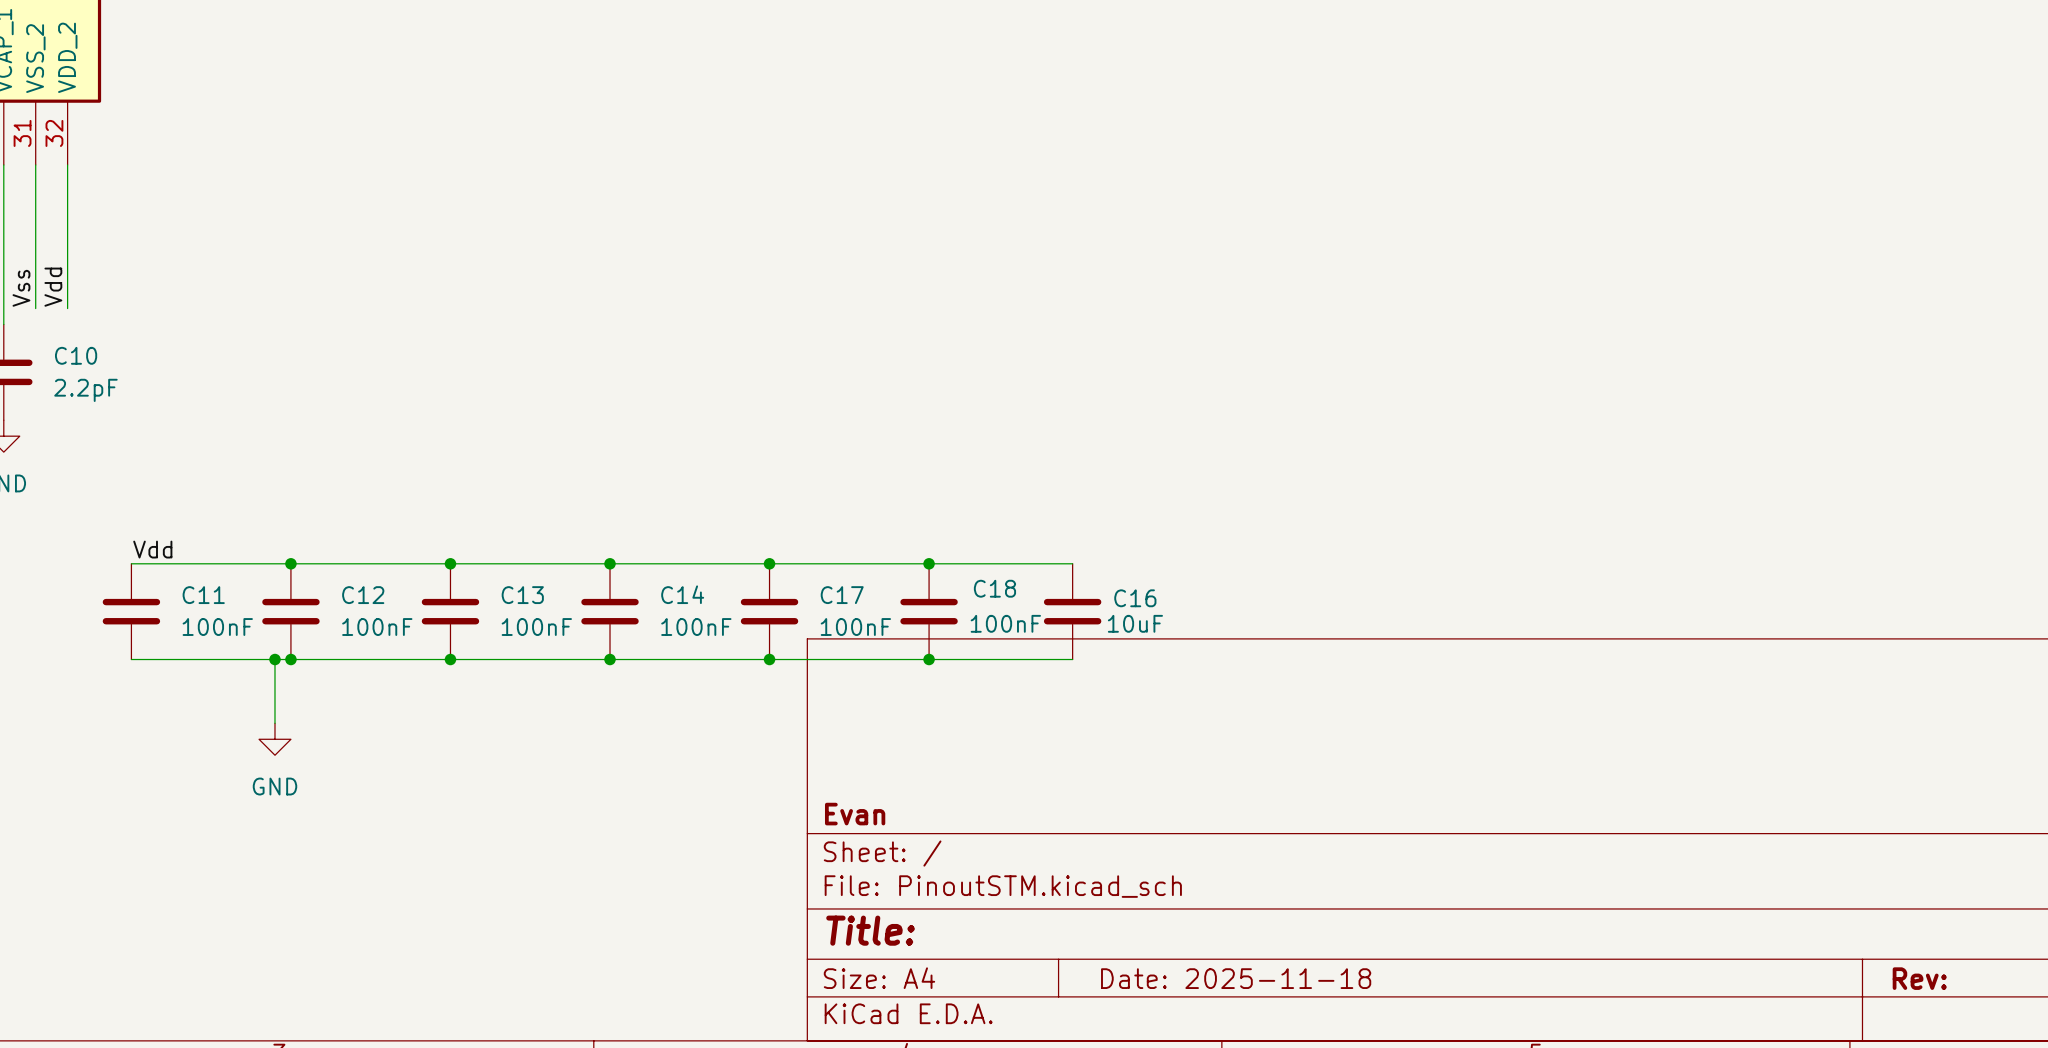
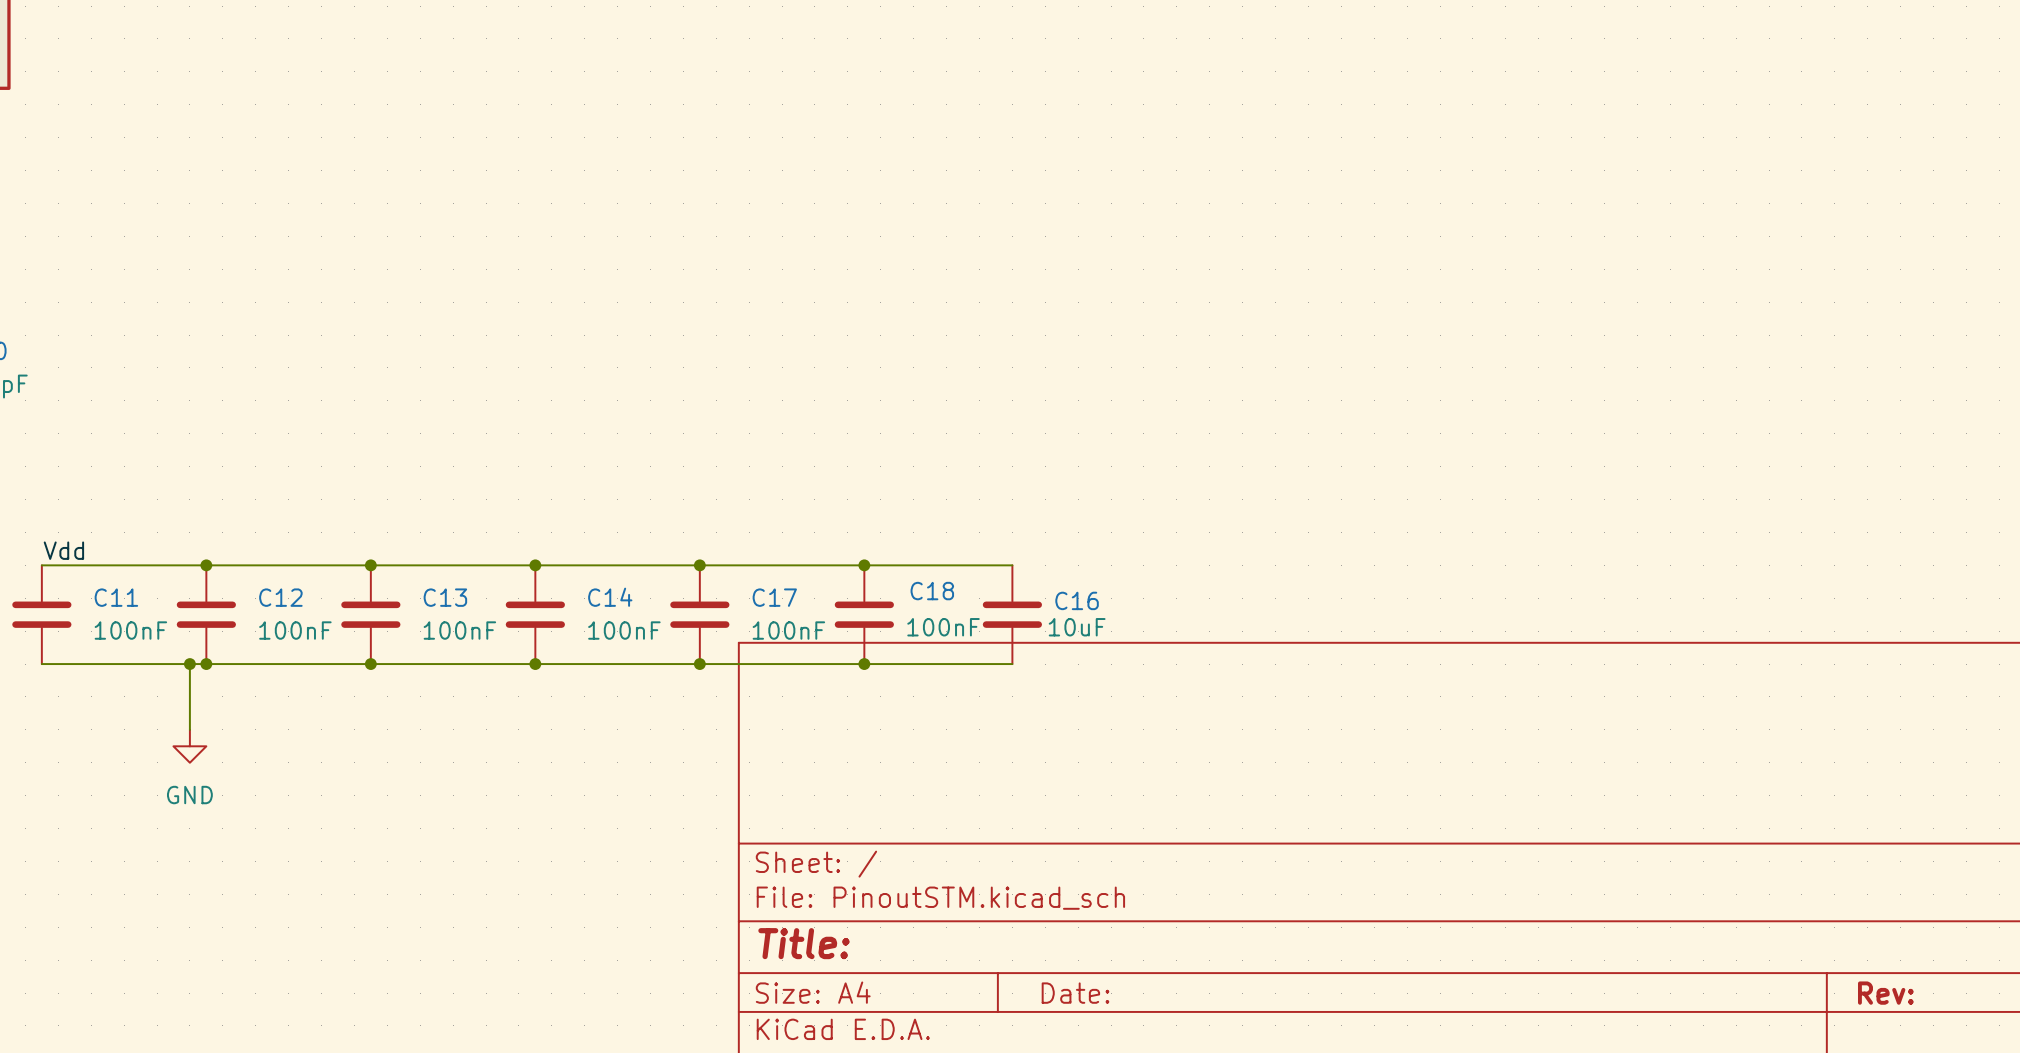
title block: Evan (855, 814) -> none
title block: Date: 2025-11-18 (1236, 978) -> Date: (1075, 993)

